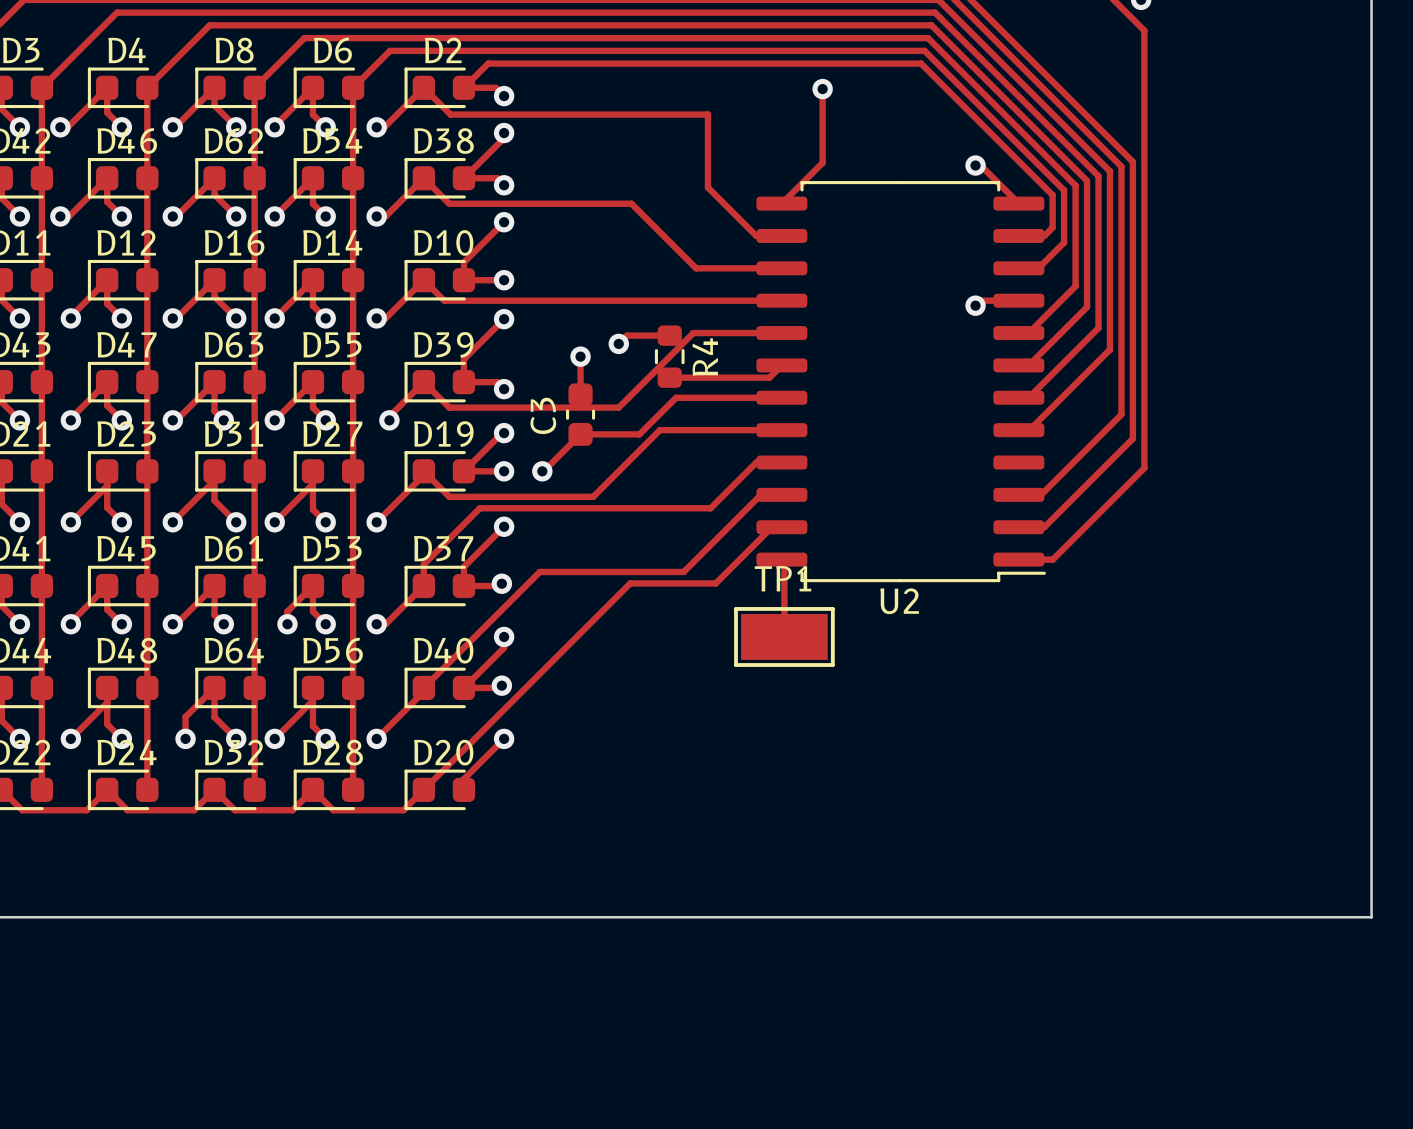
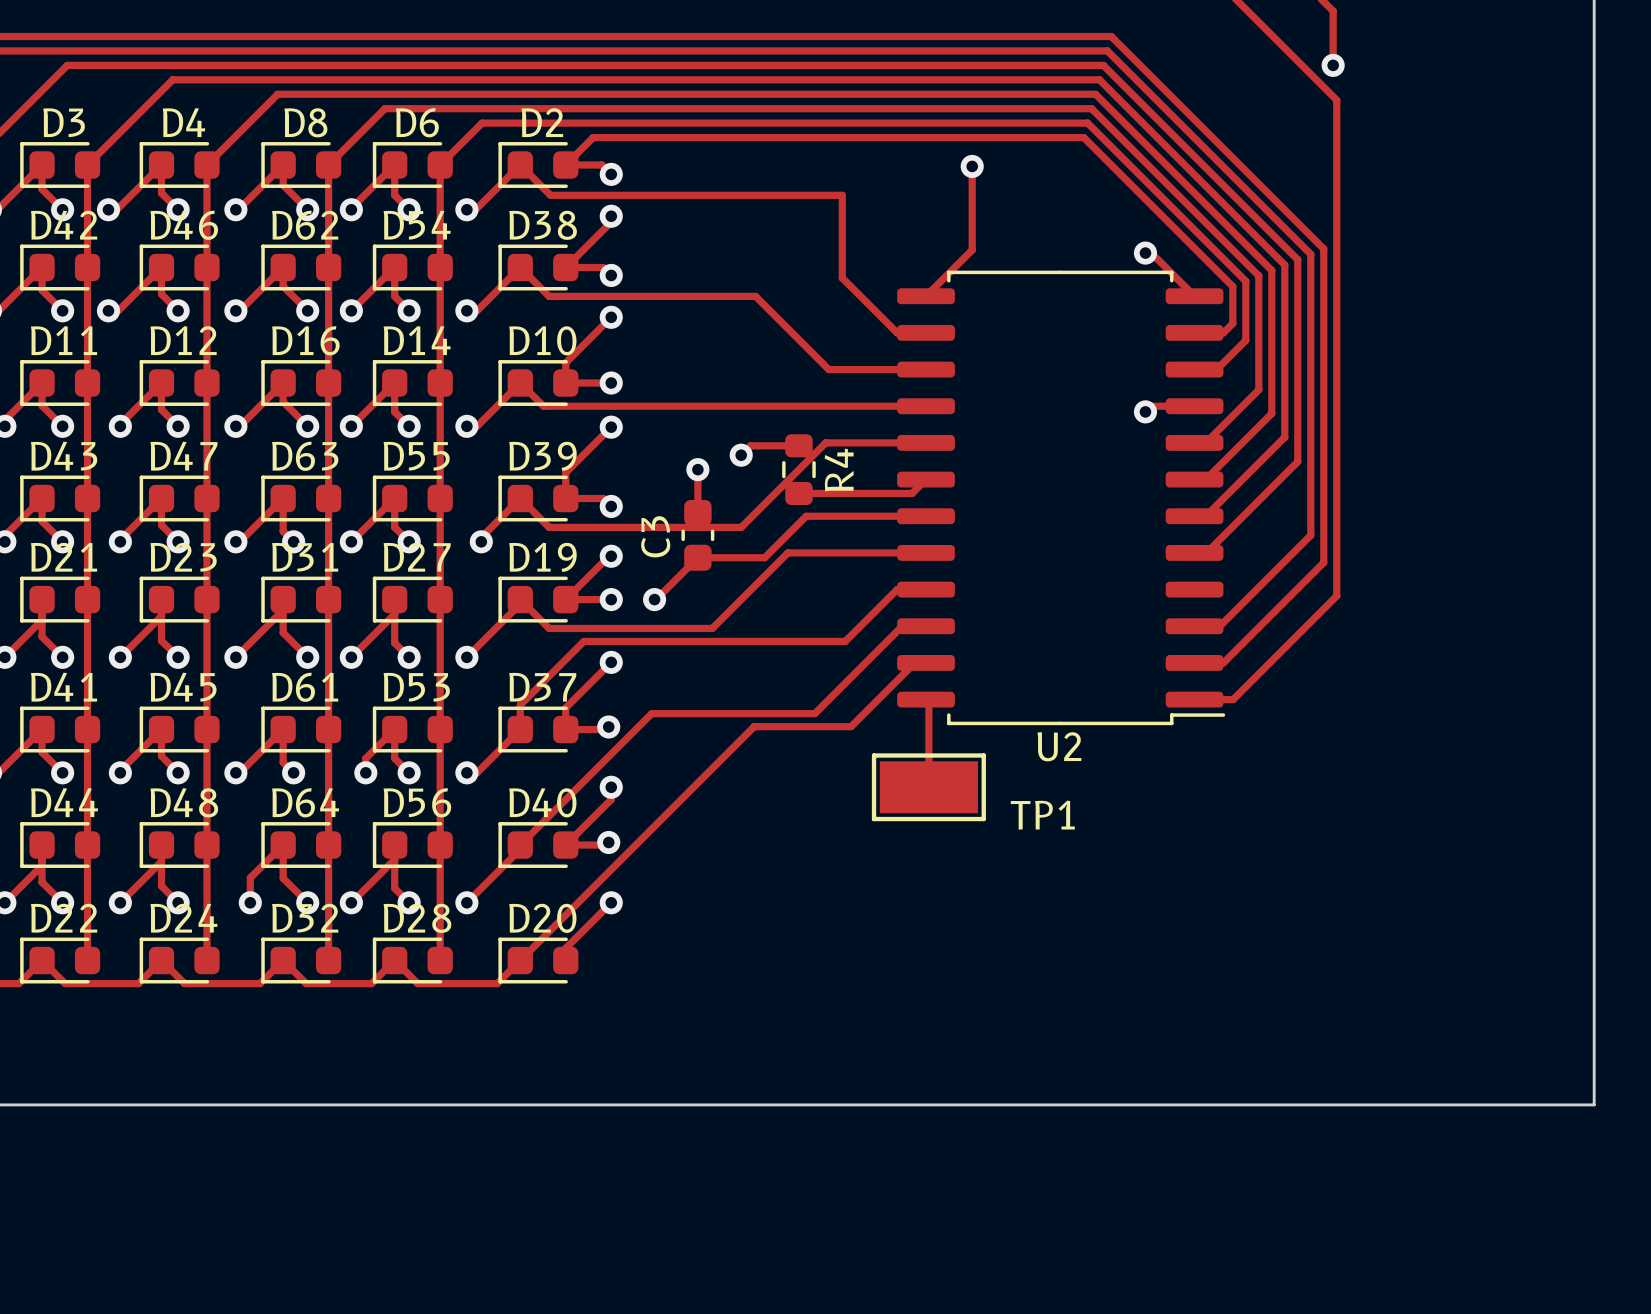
TP1 name position: TP1 (782, 578) -> TP1 (1042, 815)

